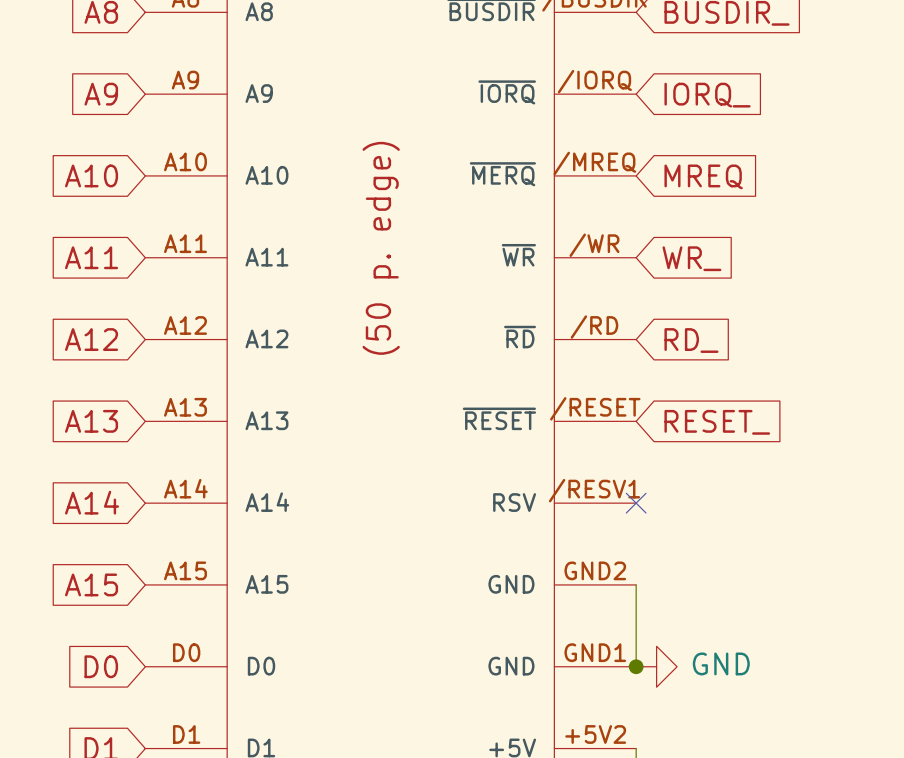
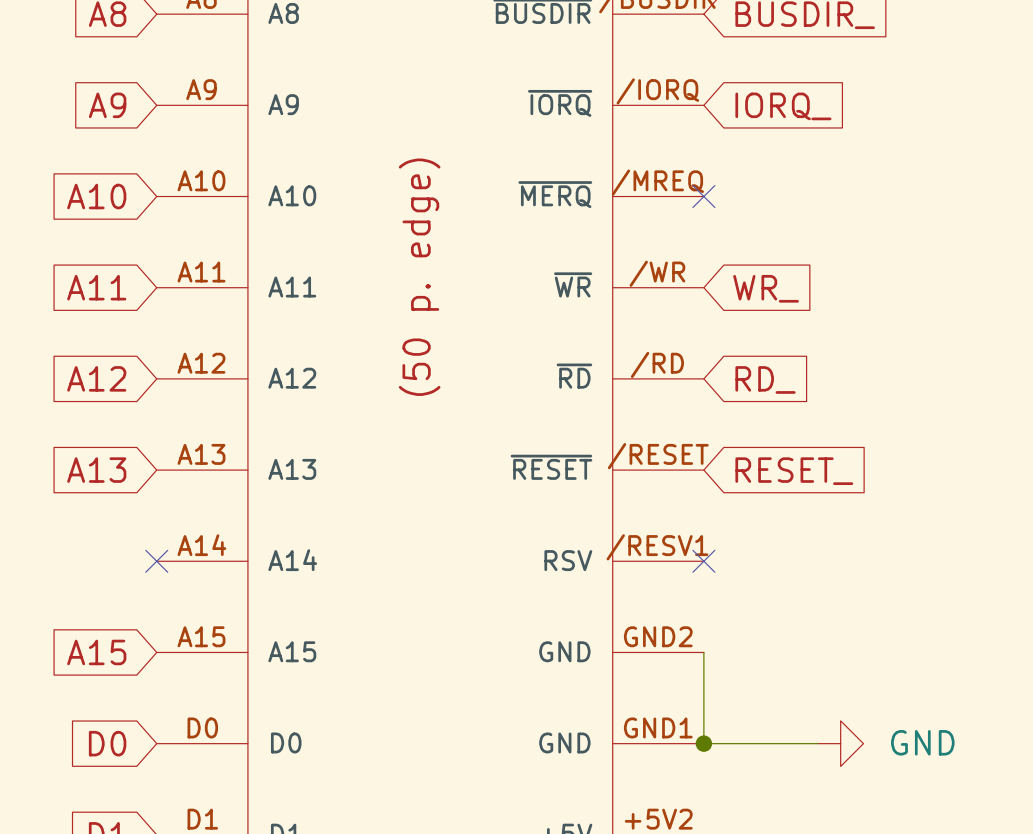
no-connect mark: none -> (703, 196)
global label: MREQ (703, 176) -> none
global label: A14 (92, 502) -> none
no-connect mark: none -> (156, 561)
power symbol text position: GND (721, 663) -> GND (922, 742)
wire: none -> (703, 743) (817, 743)
power symbol position: GND (656, 666) -> GND (840, 743)

